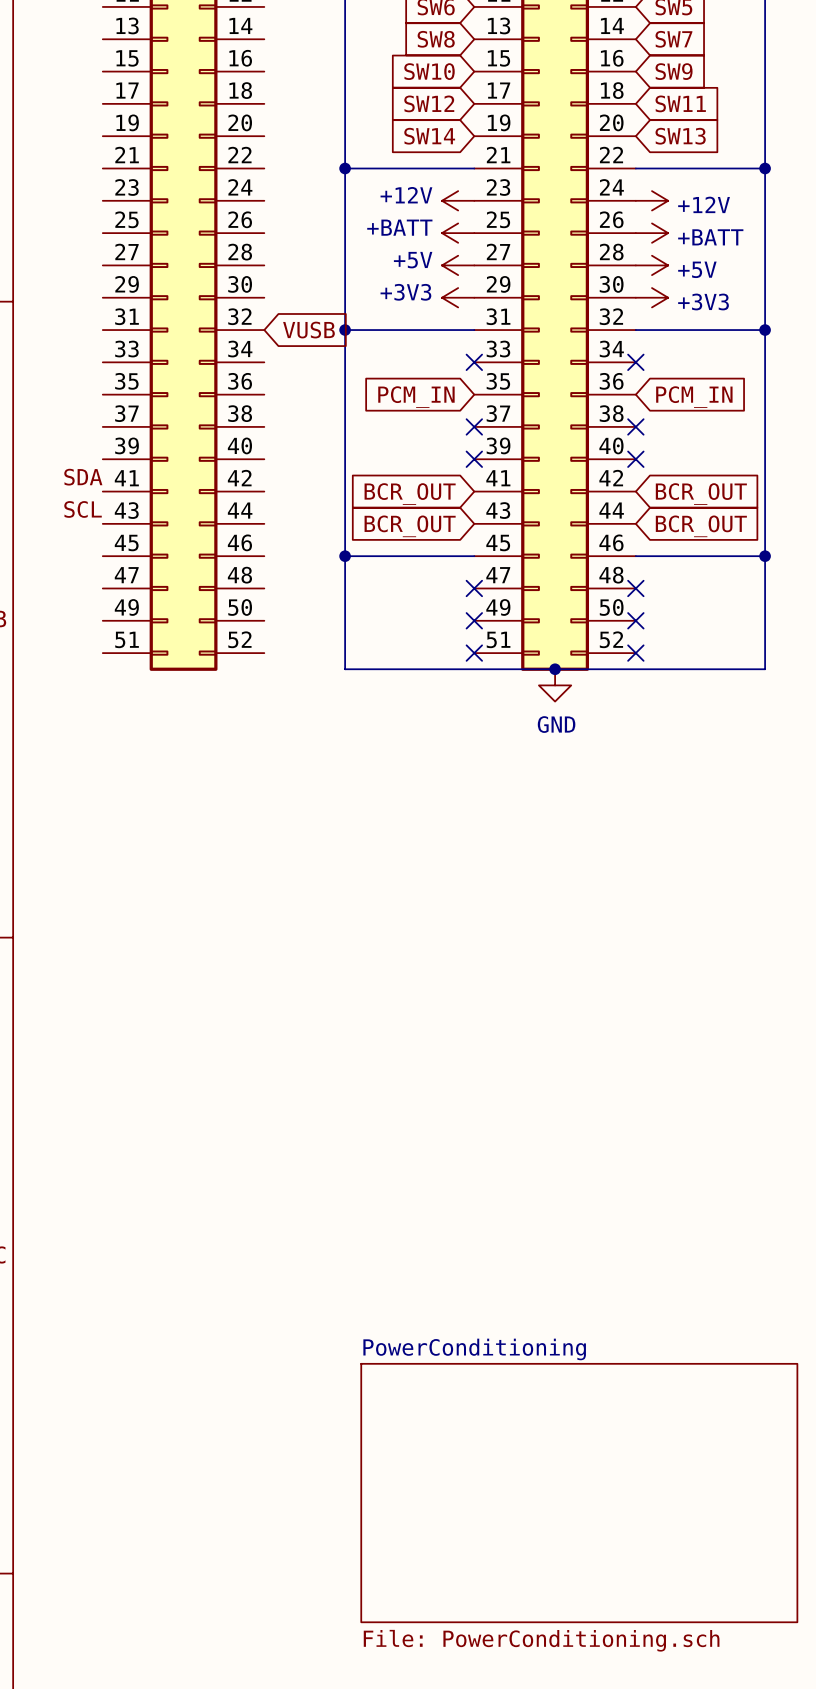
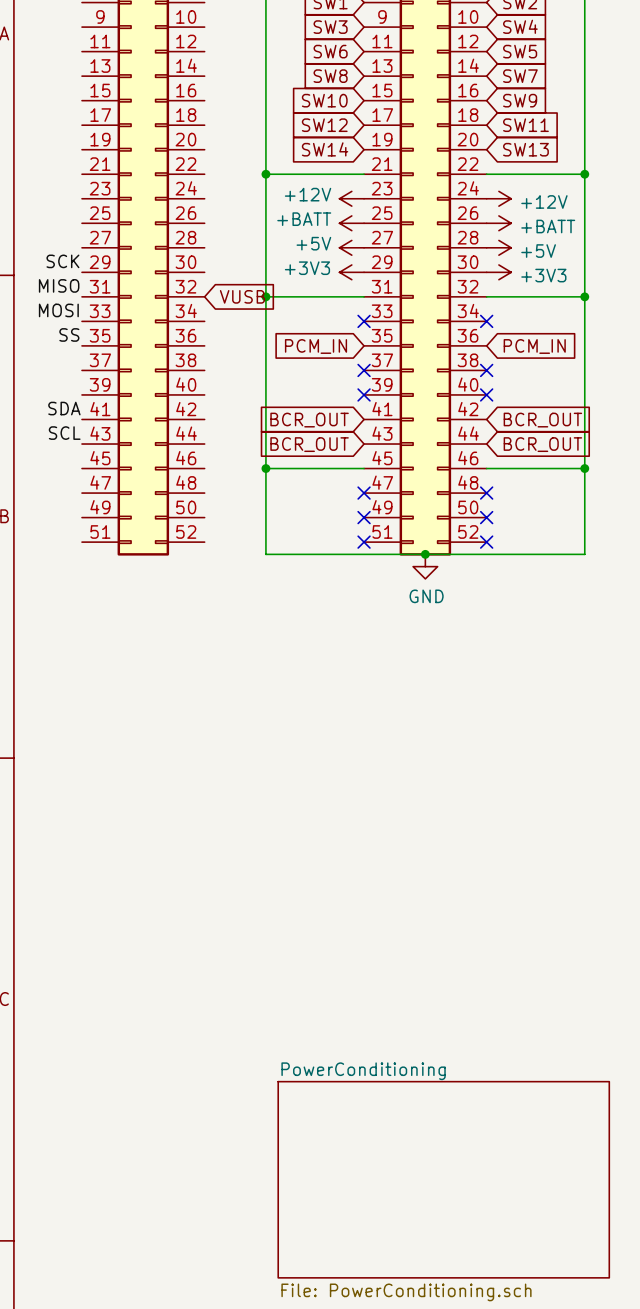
label: none -> SCK (62, 261)
label: none -> MISO (59, 285)
label: none -> MOSI (58, 310)
label: none -> SS (69, 334)

